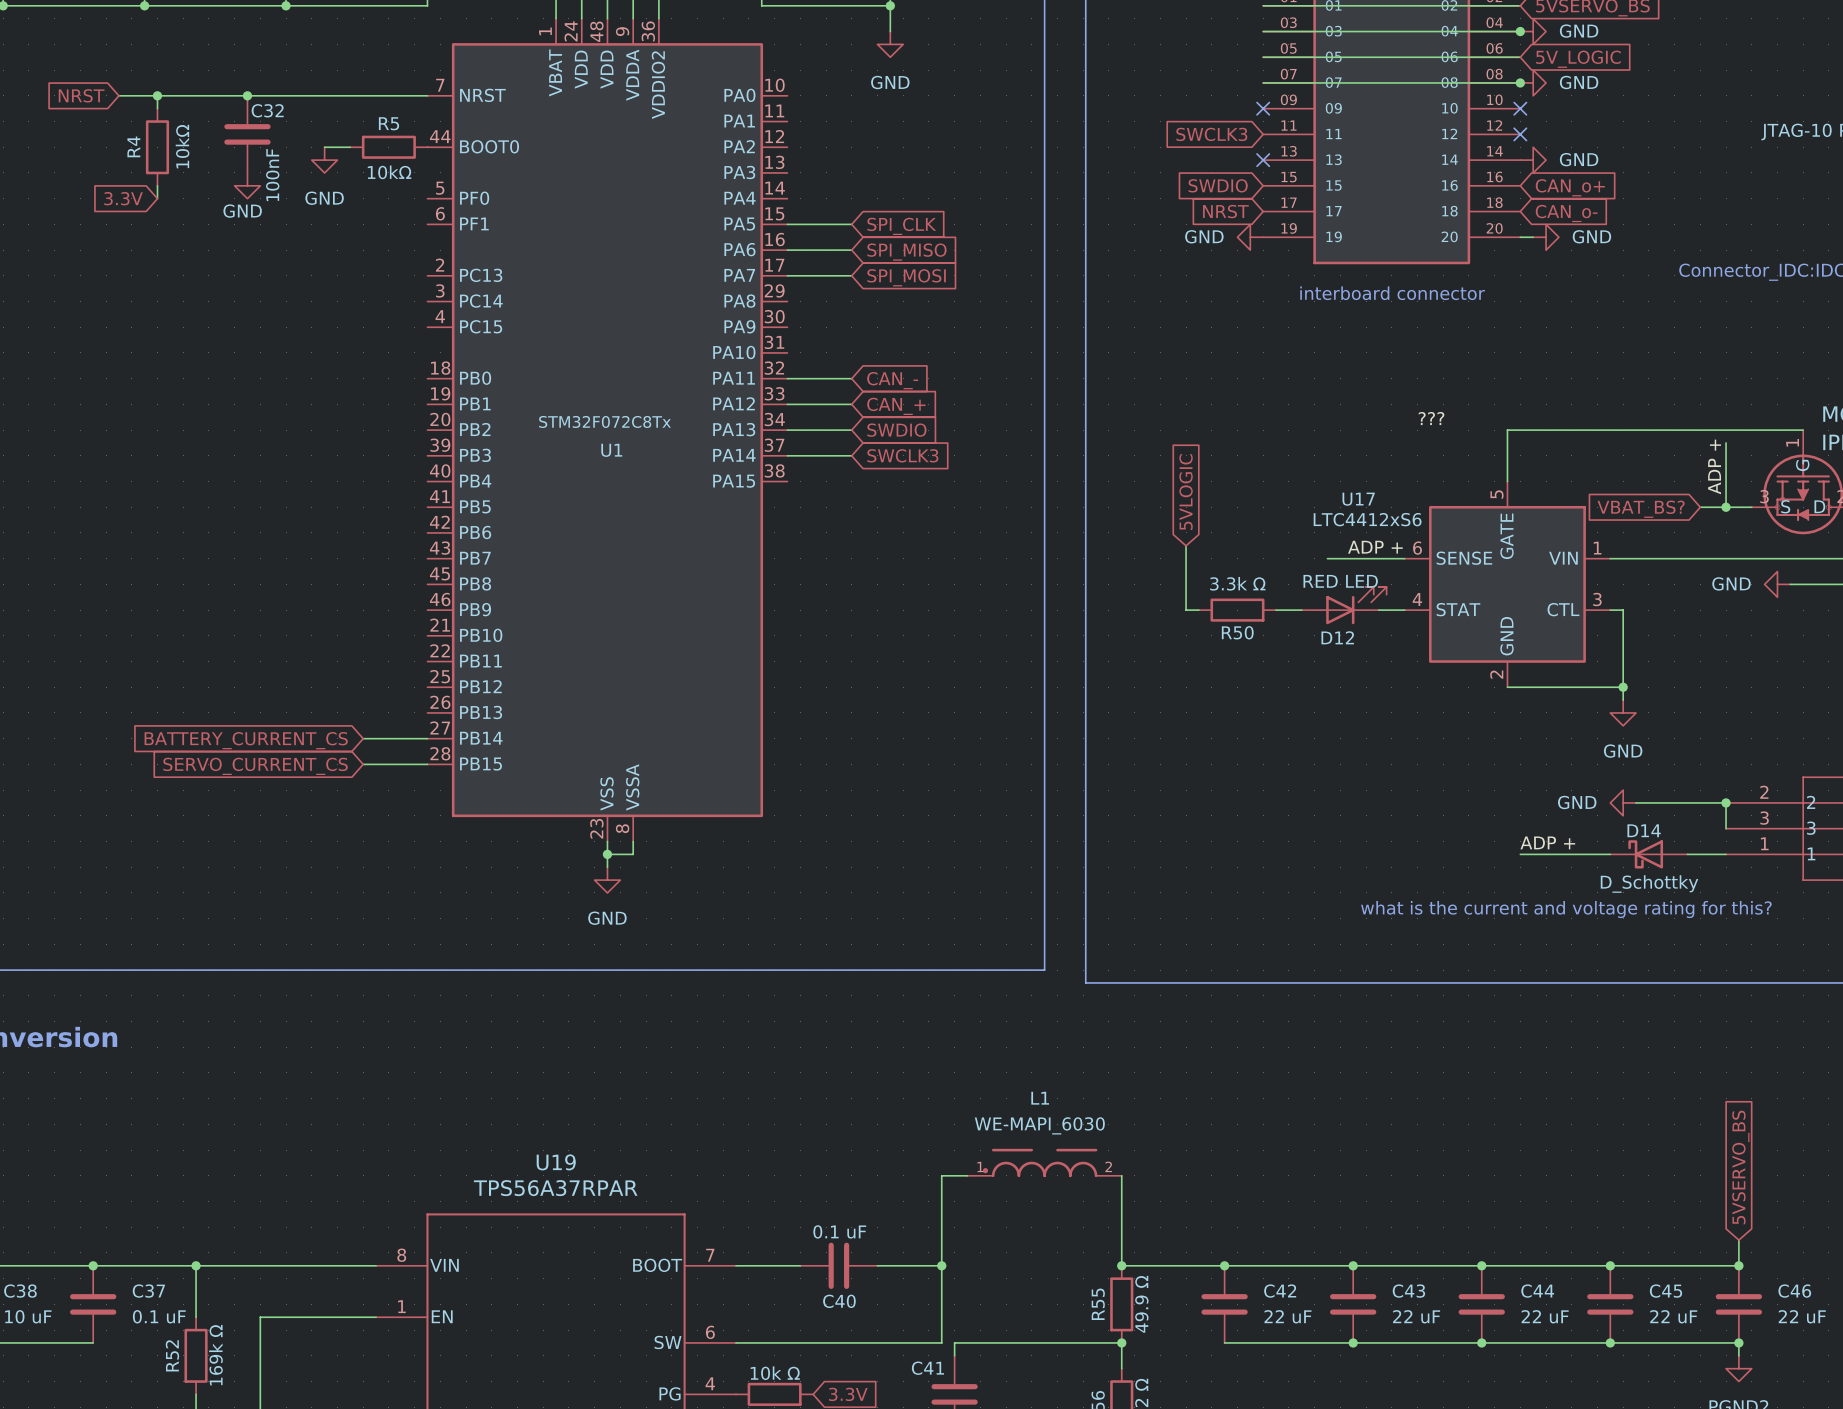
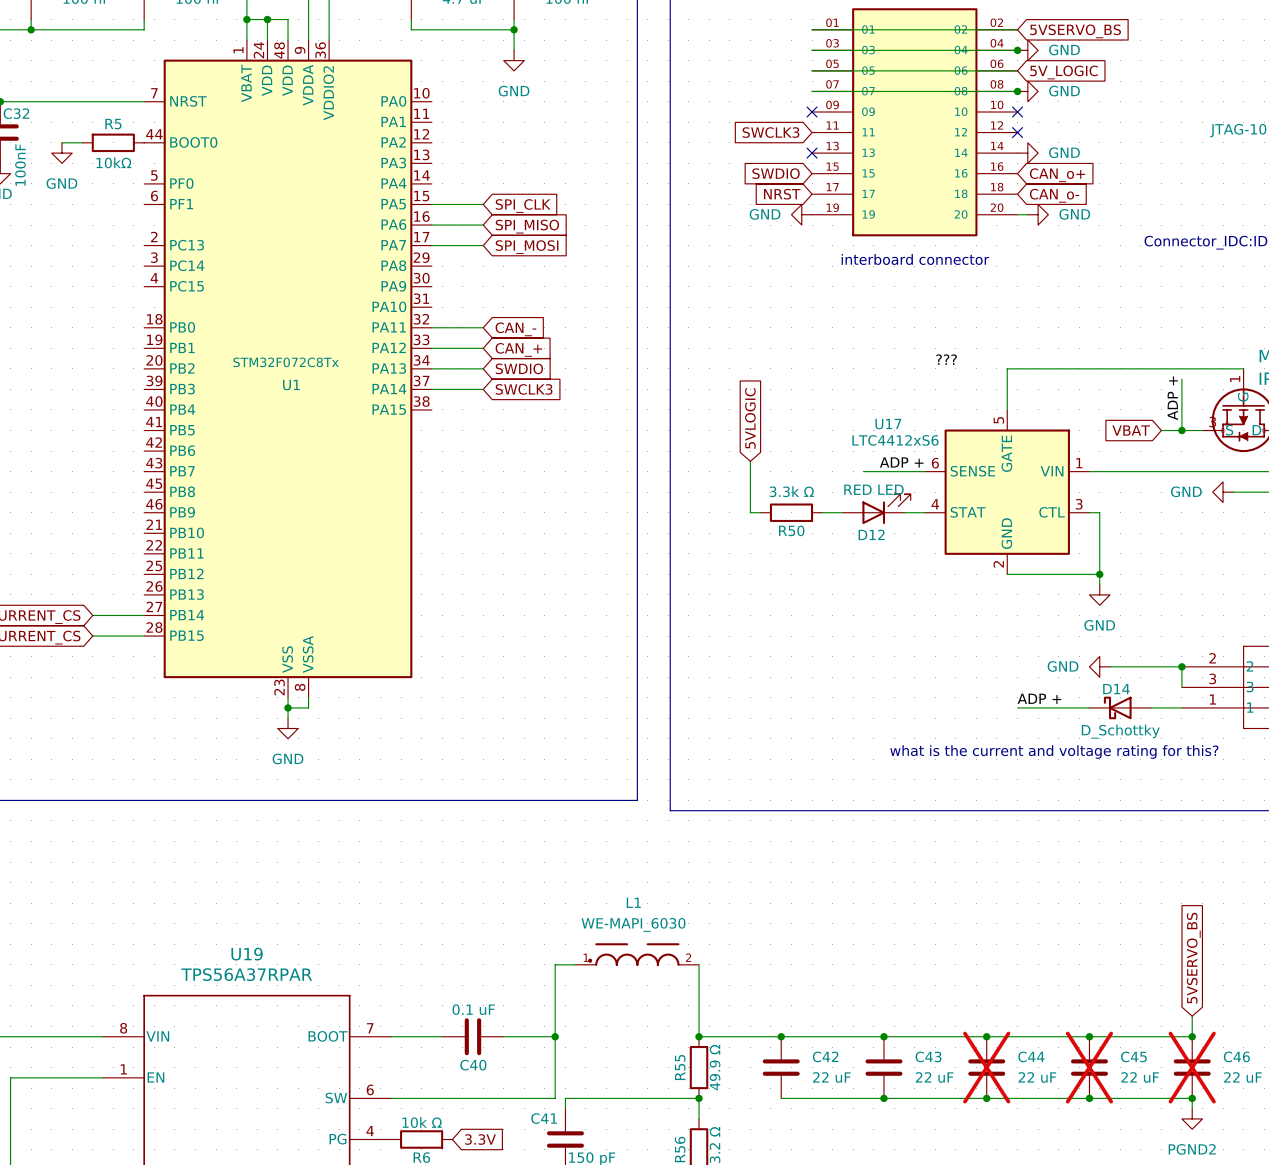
global label: VBAT_BS? (1641, 509) -> VBAT (1131, 430)
C44 do-not-place cross: none -> (986, 1067)
C45 do-not-place cross: none -> (1089, 1067)
C46 do-not-place cross: none -> (1192, 1067)

